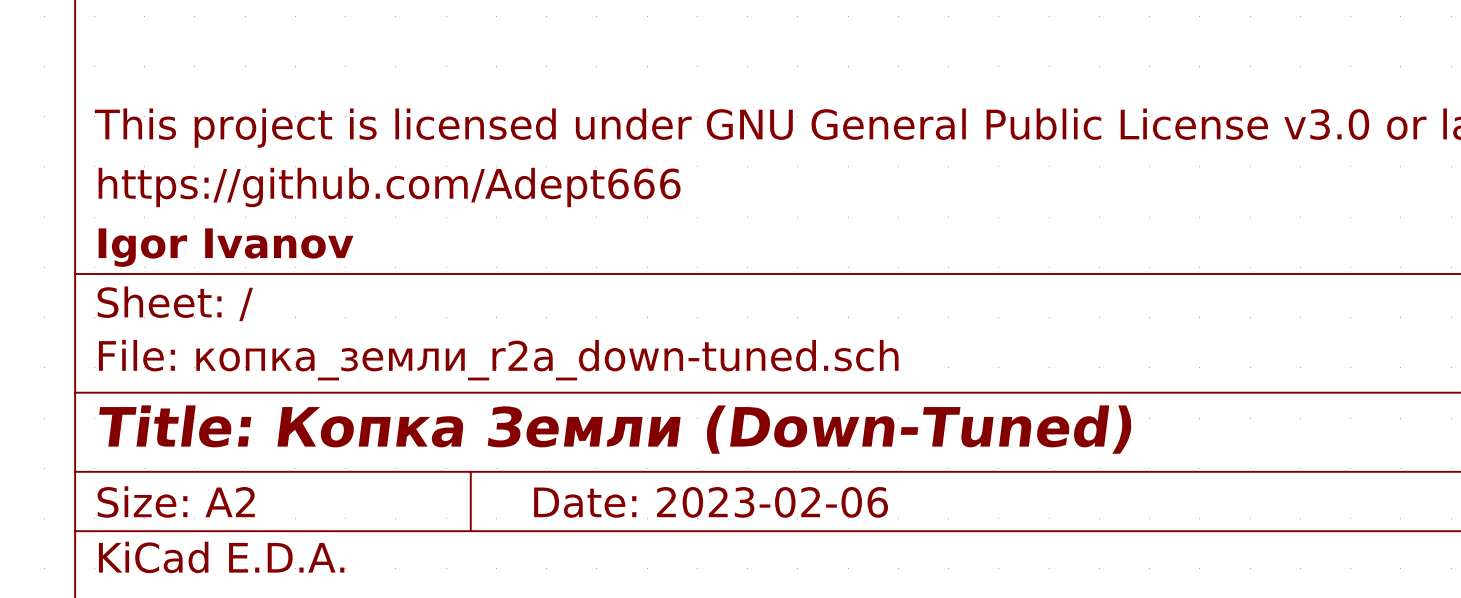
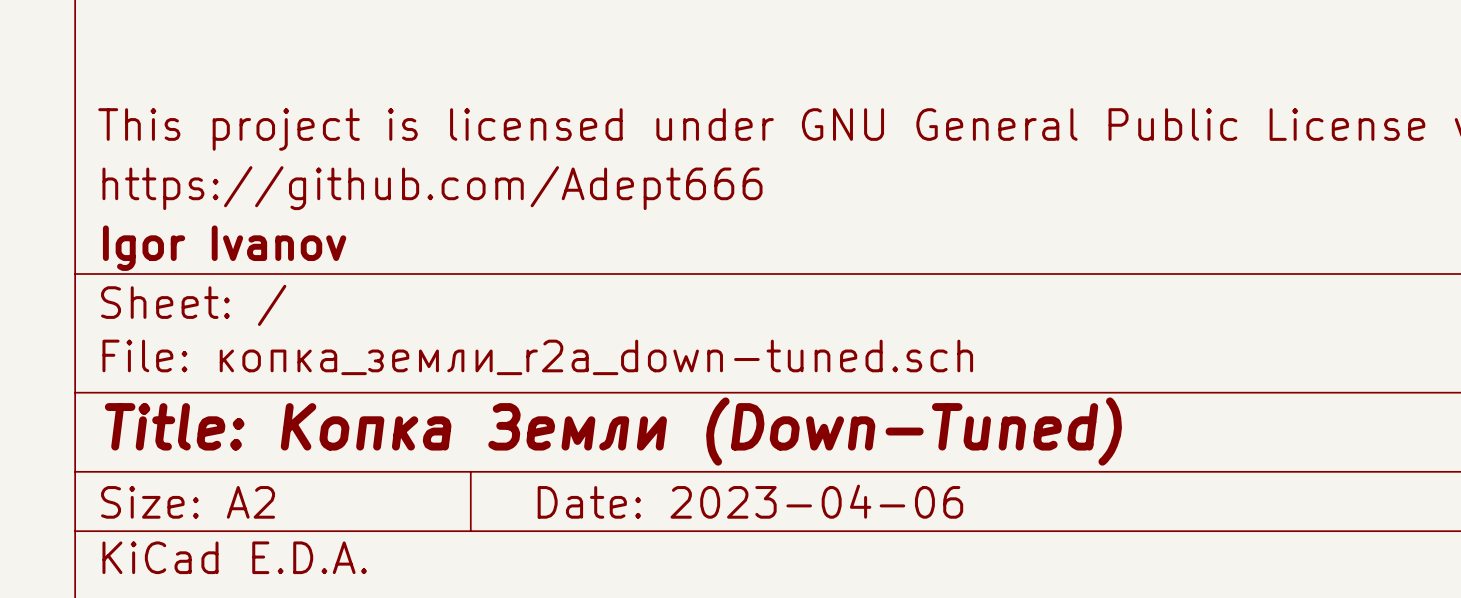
title block: Date: 2023-02-06 (711, 502) -> Date: 2023-04-06 (750, 501)

